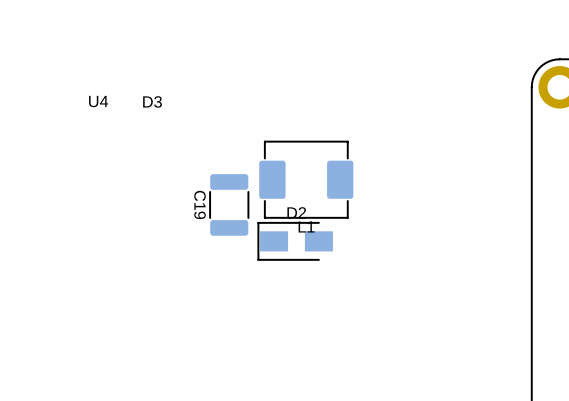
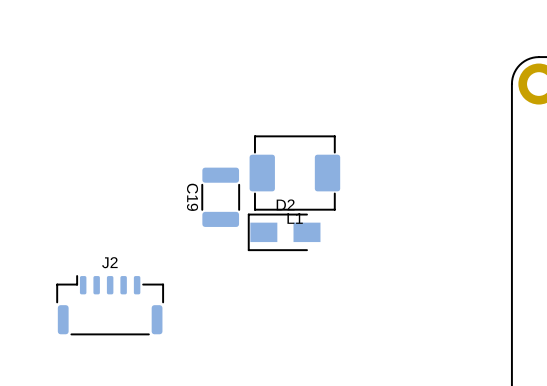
U4: (98, 101) -> none
D3: (152, 101) -> none
J2: none -> (110, 305)

